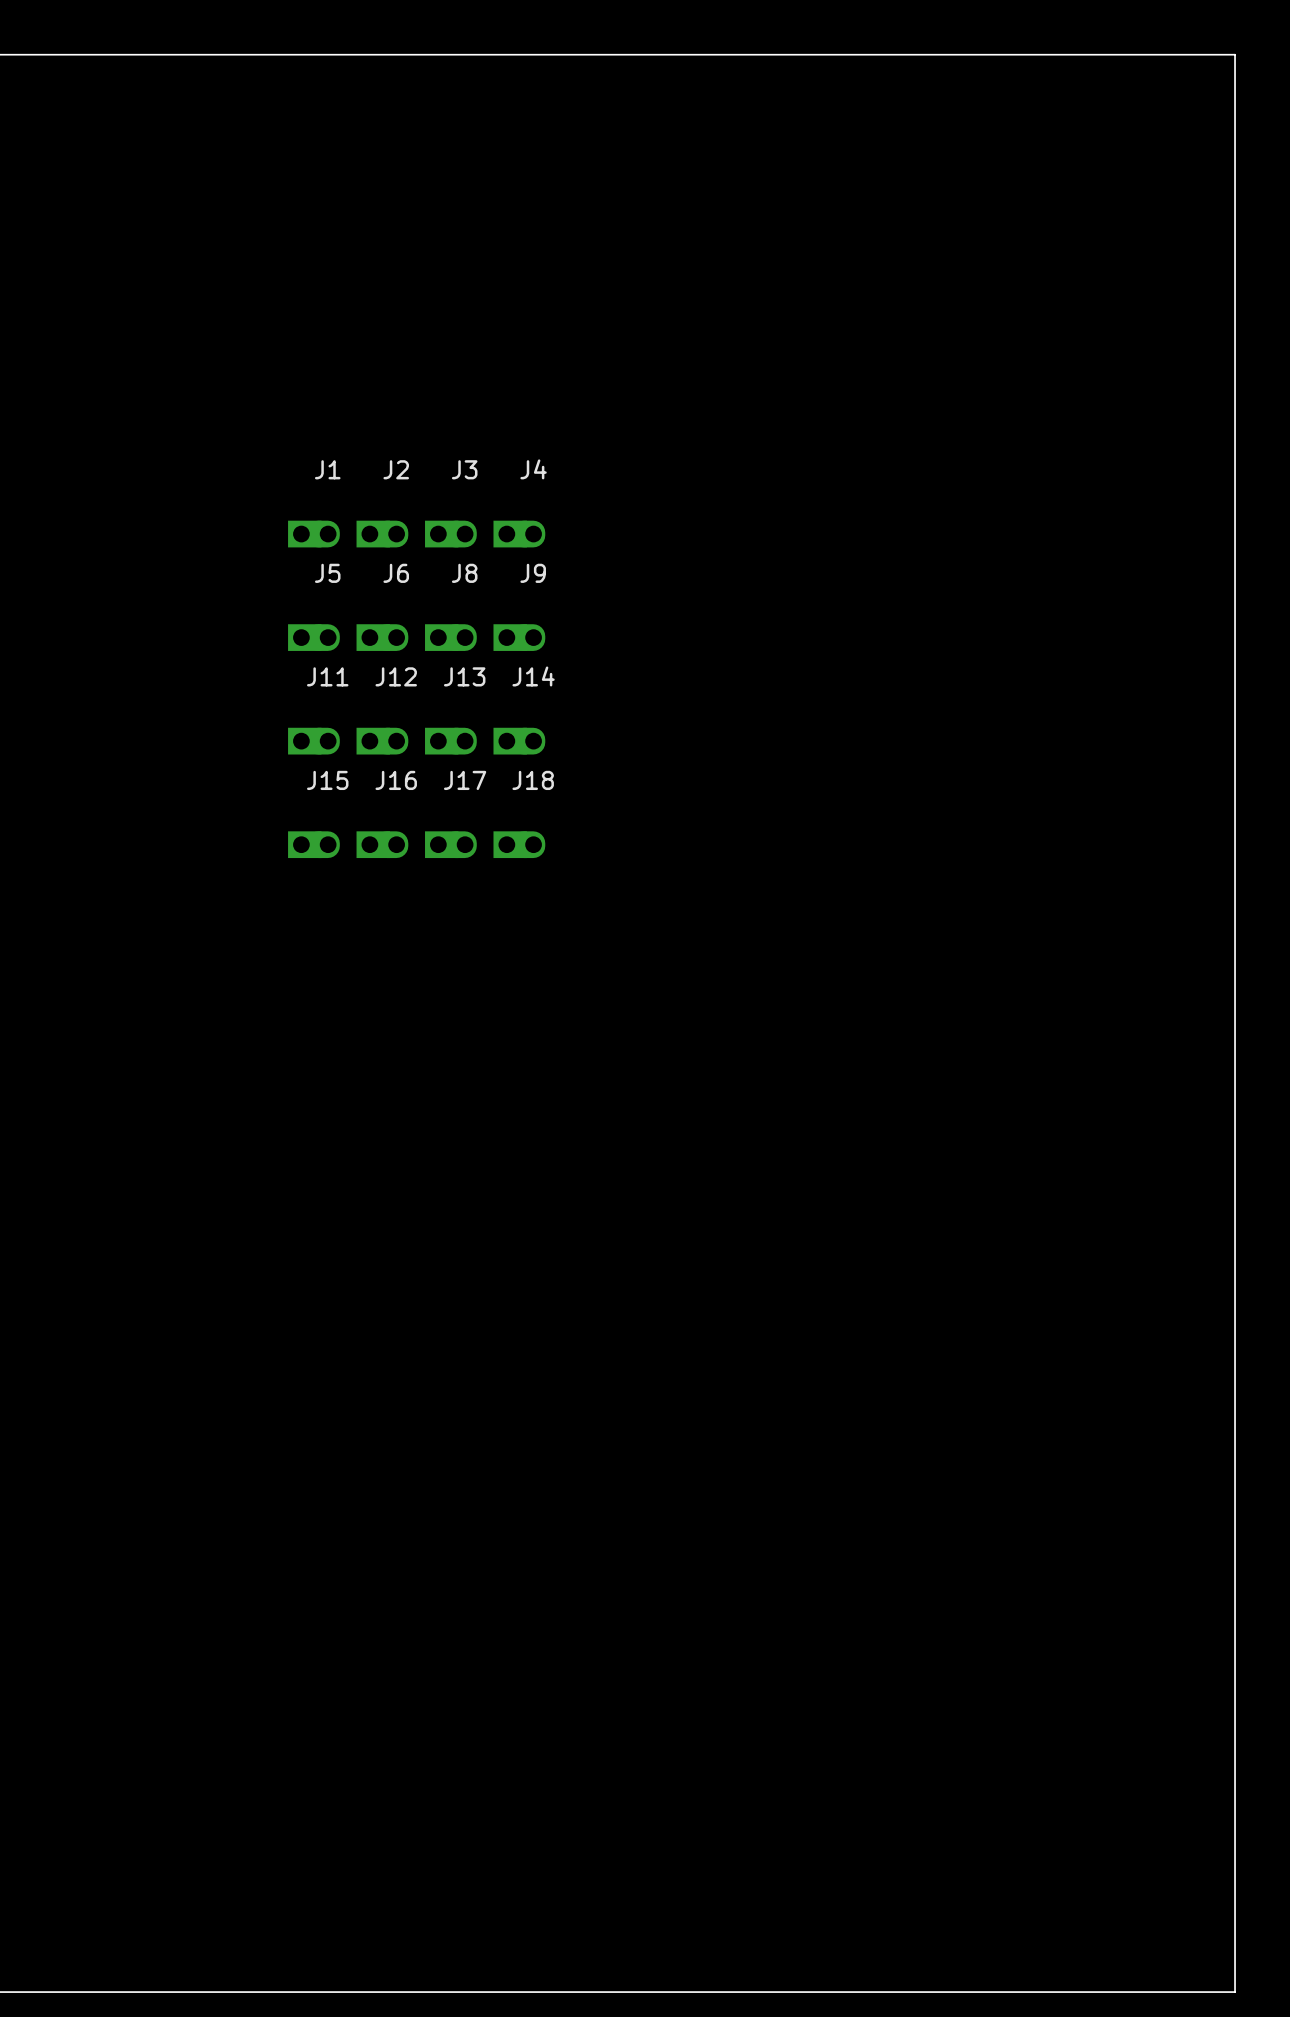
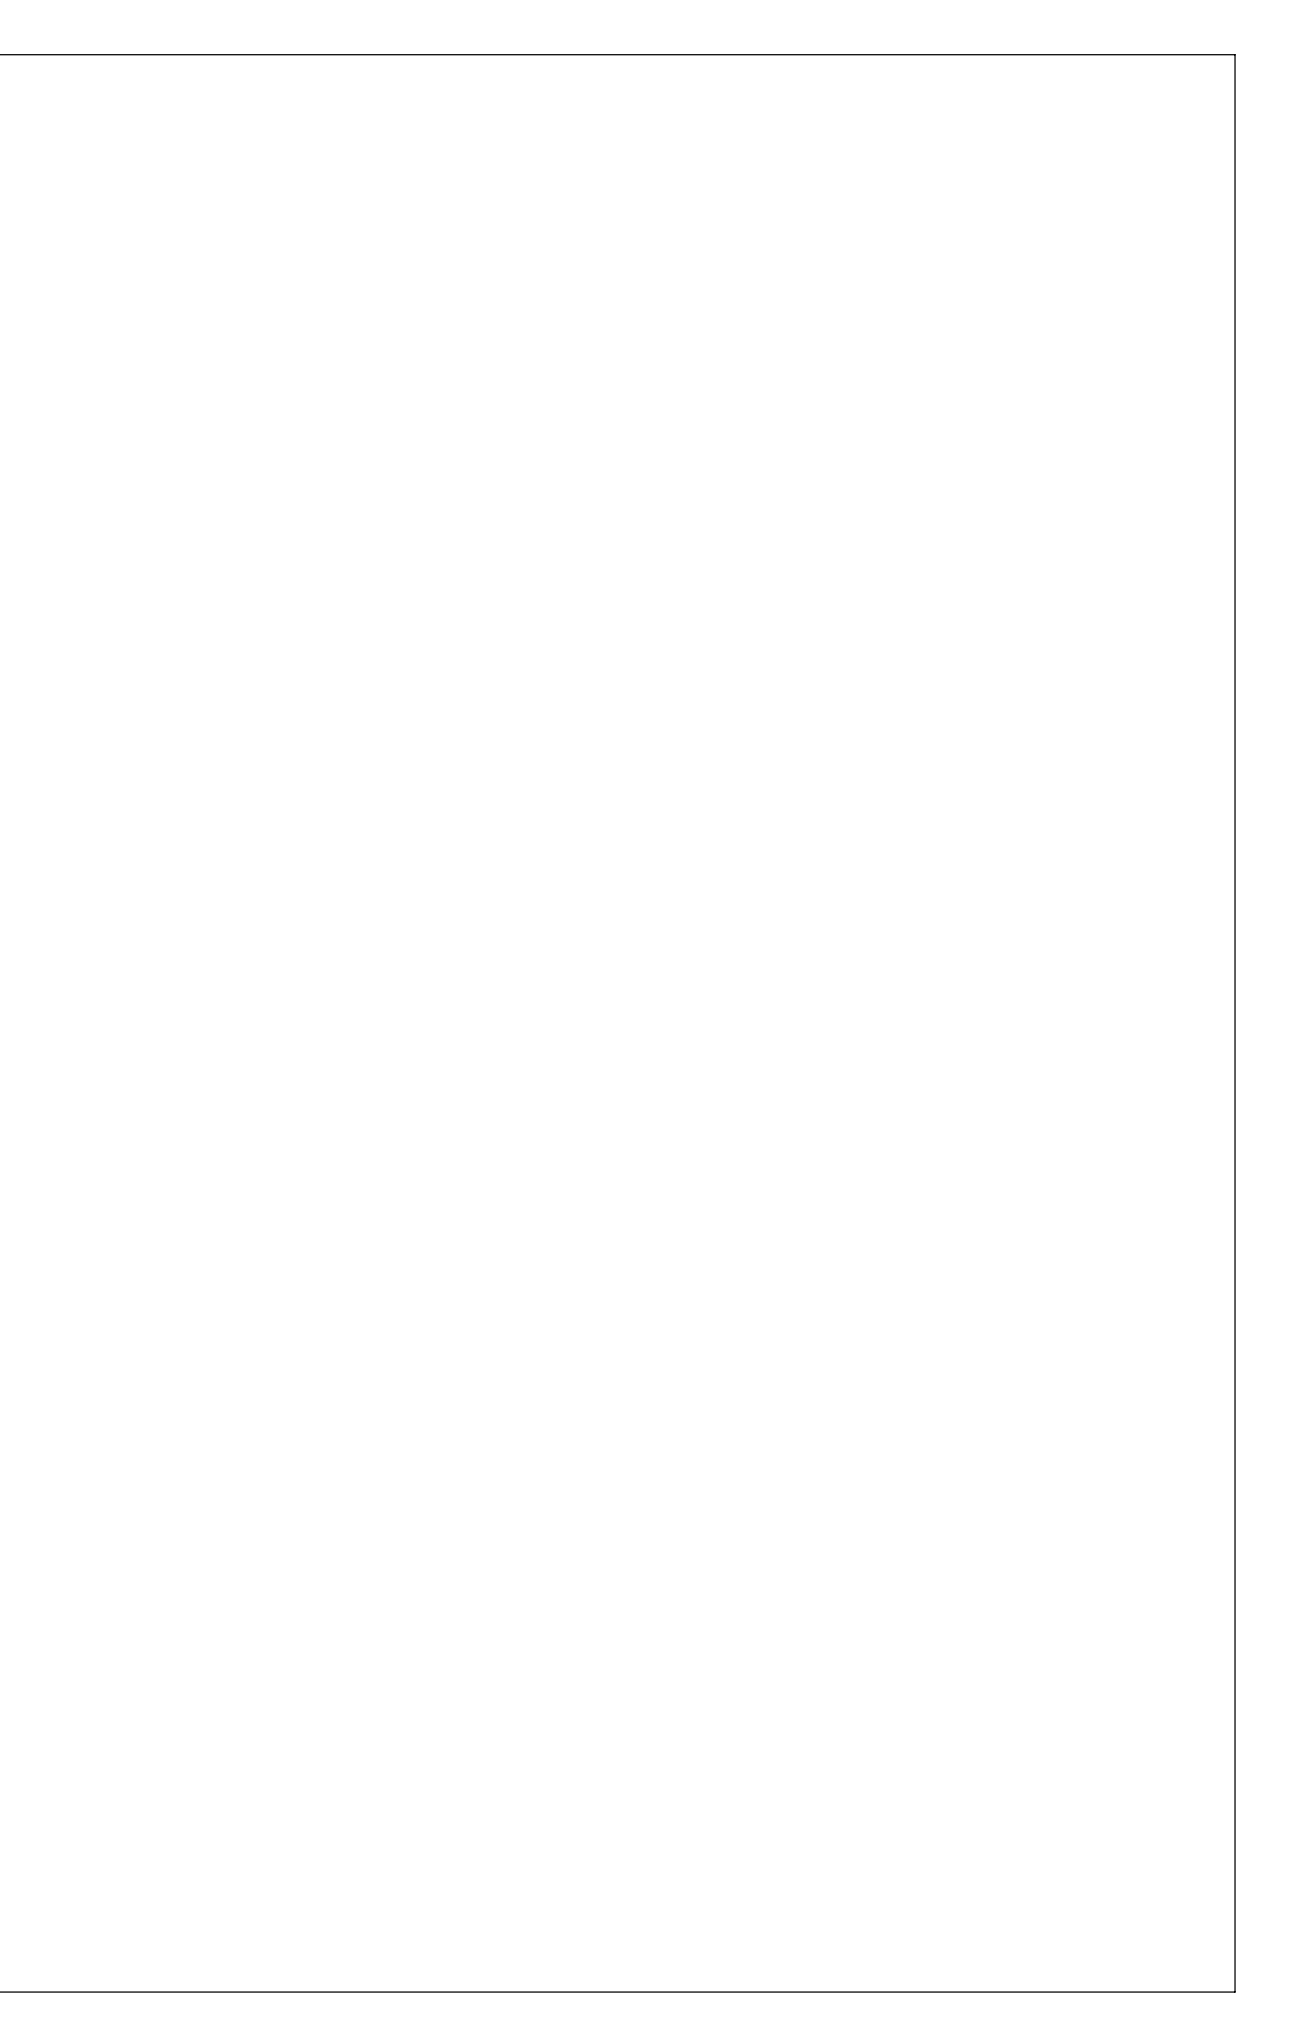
J1: (313, 534) -> none
J2: (382, 534) -> none
J3: (450, 534) -> none
J4: (519, 534) -> none
J5: (313, 637) -> none
J6: (382, 637) -> none
J8: (450, 637) -> none
J9: (519, 637) -> none
J11: (313, 741) -> none
J12: (382, 741) -> none
J13: (450, 741) -> none
J14: (519, 741) -> none
J15: (313, 844) -> none
J16: (382, 844) -> none
J17: (450, 844) -> none
J18: (519, 844) -> none

